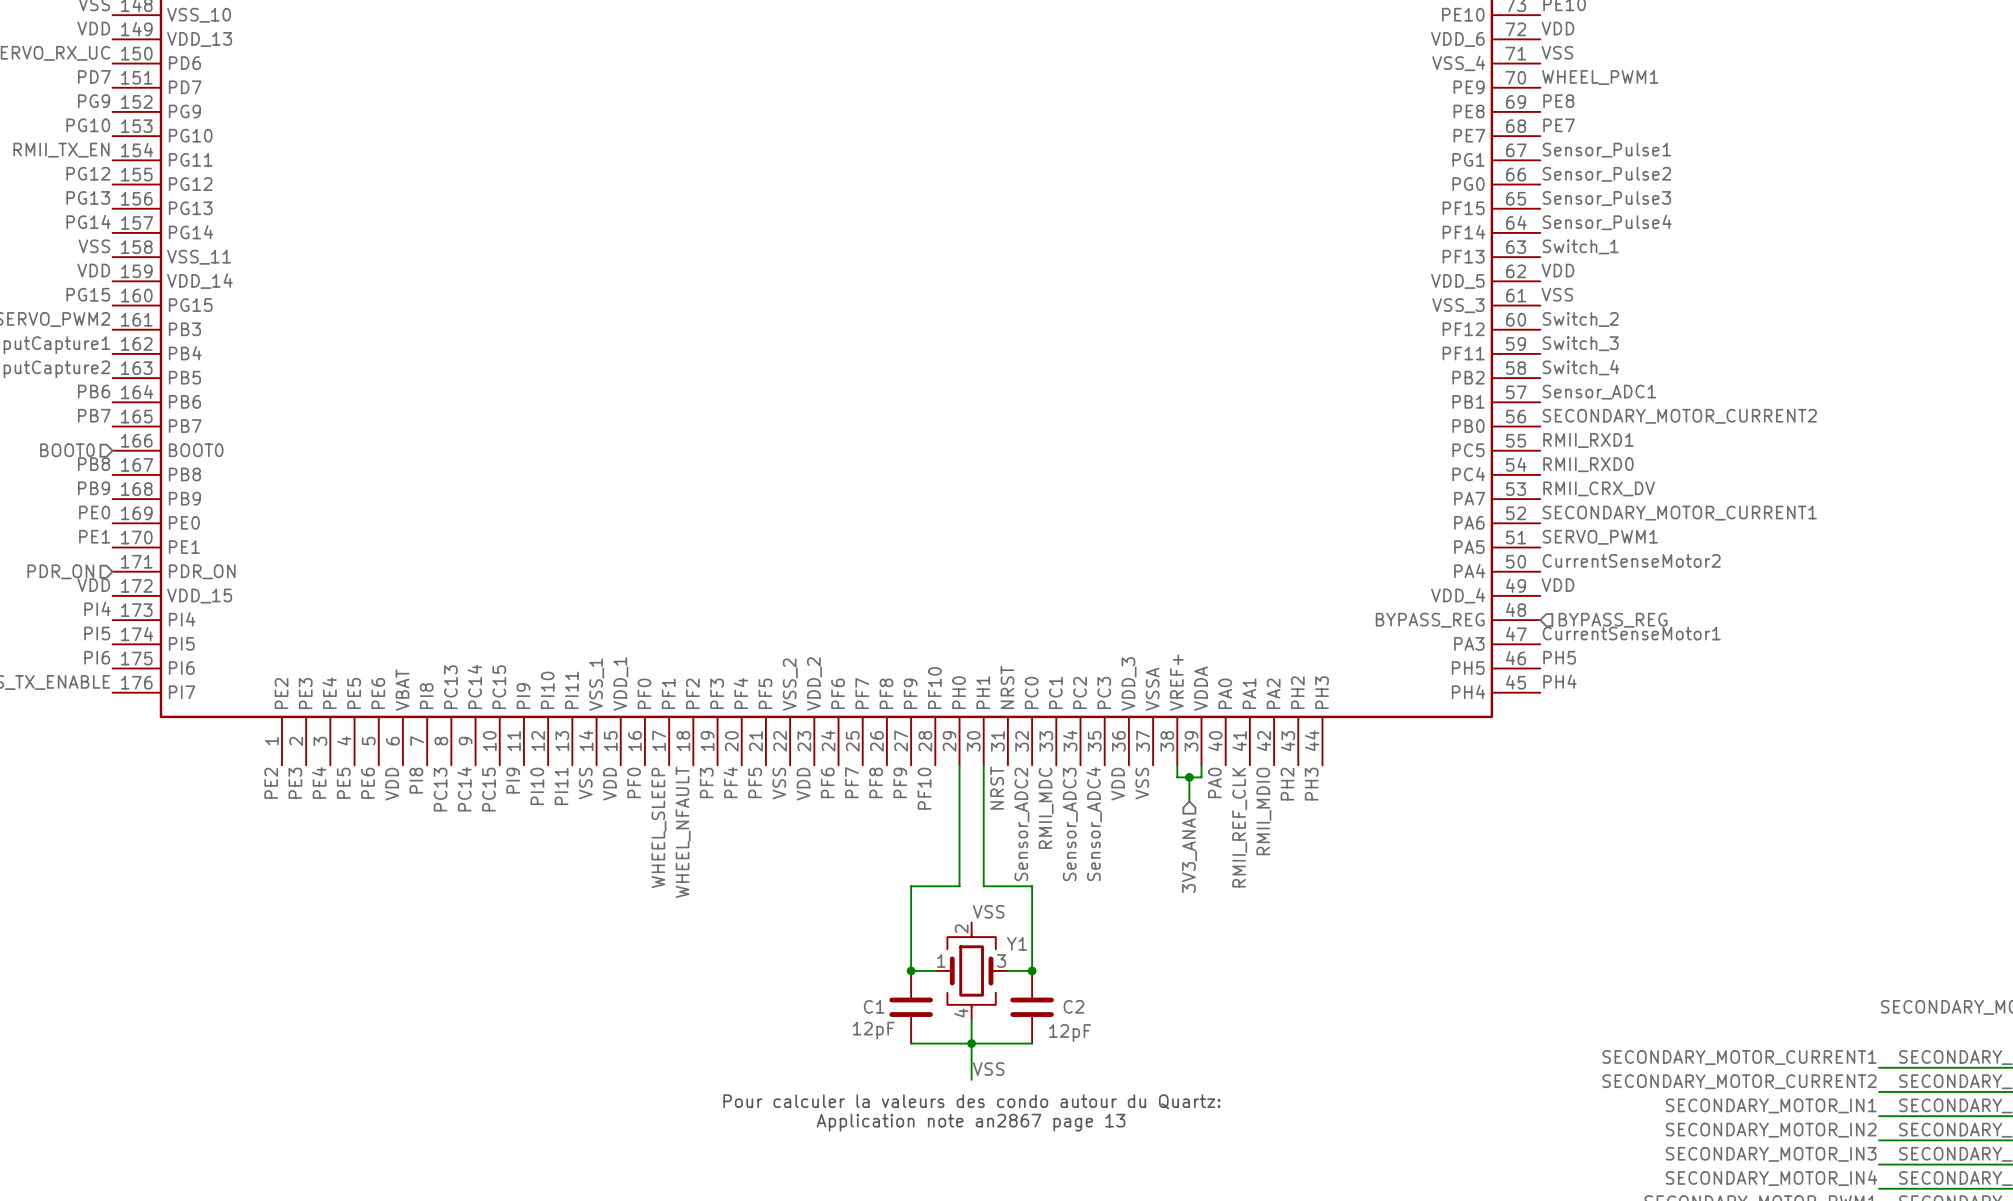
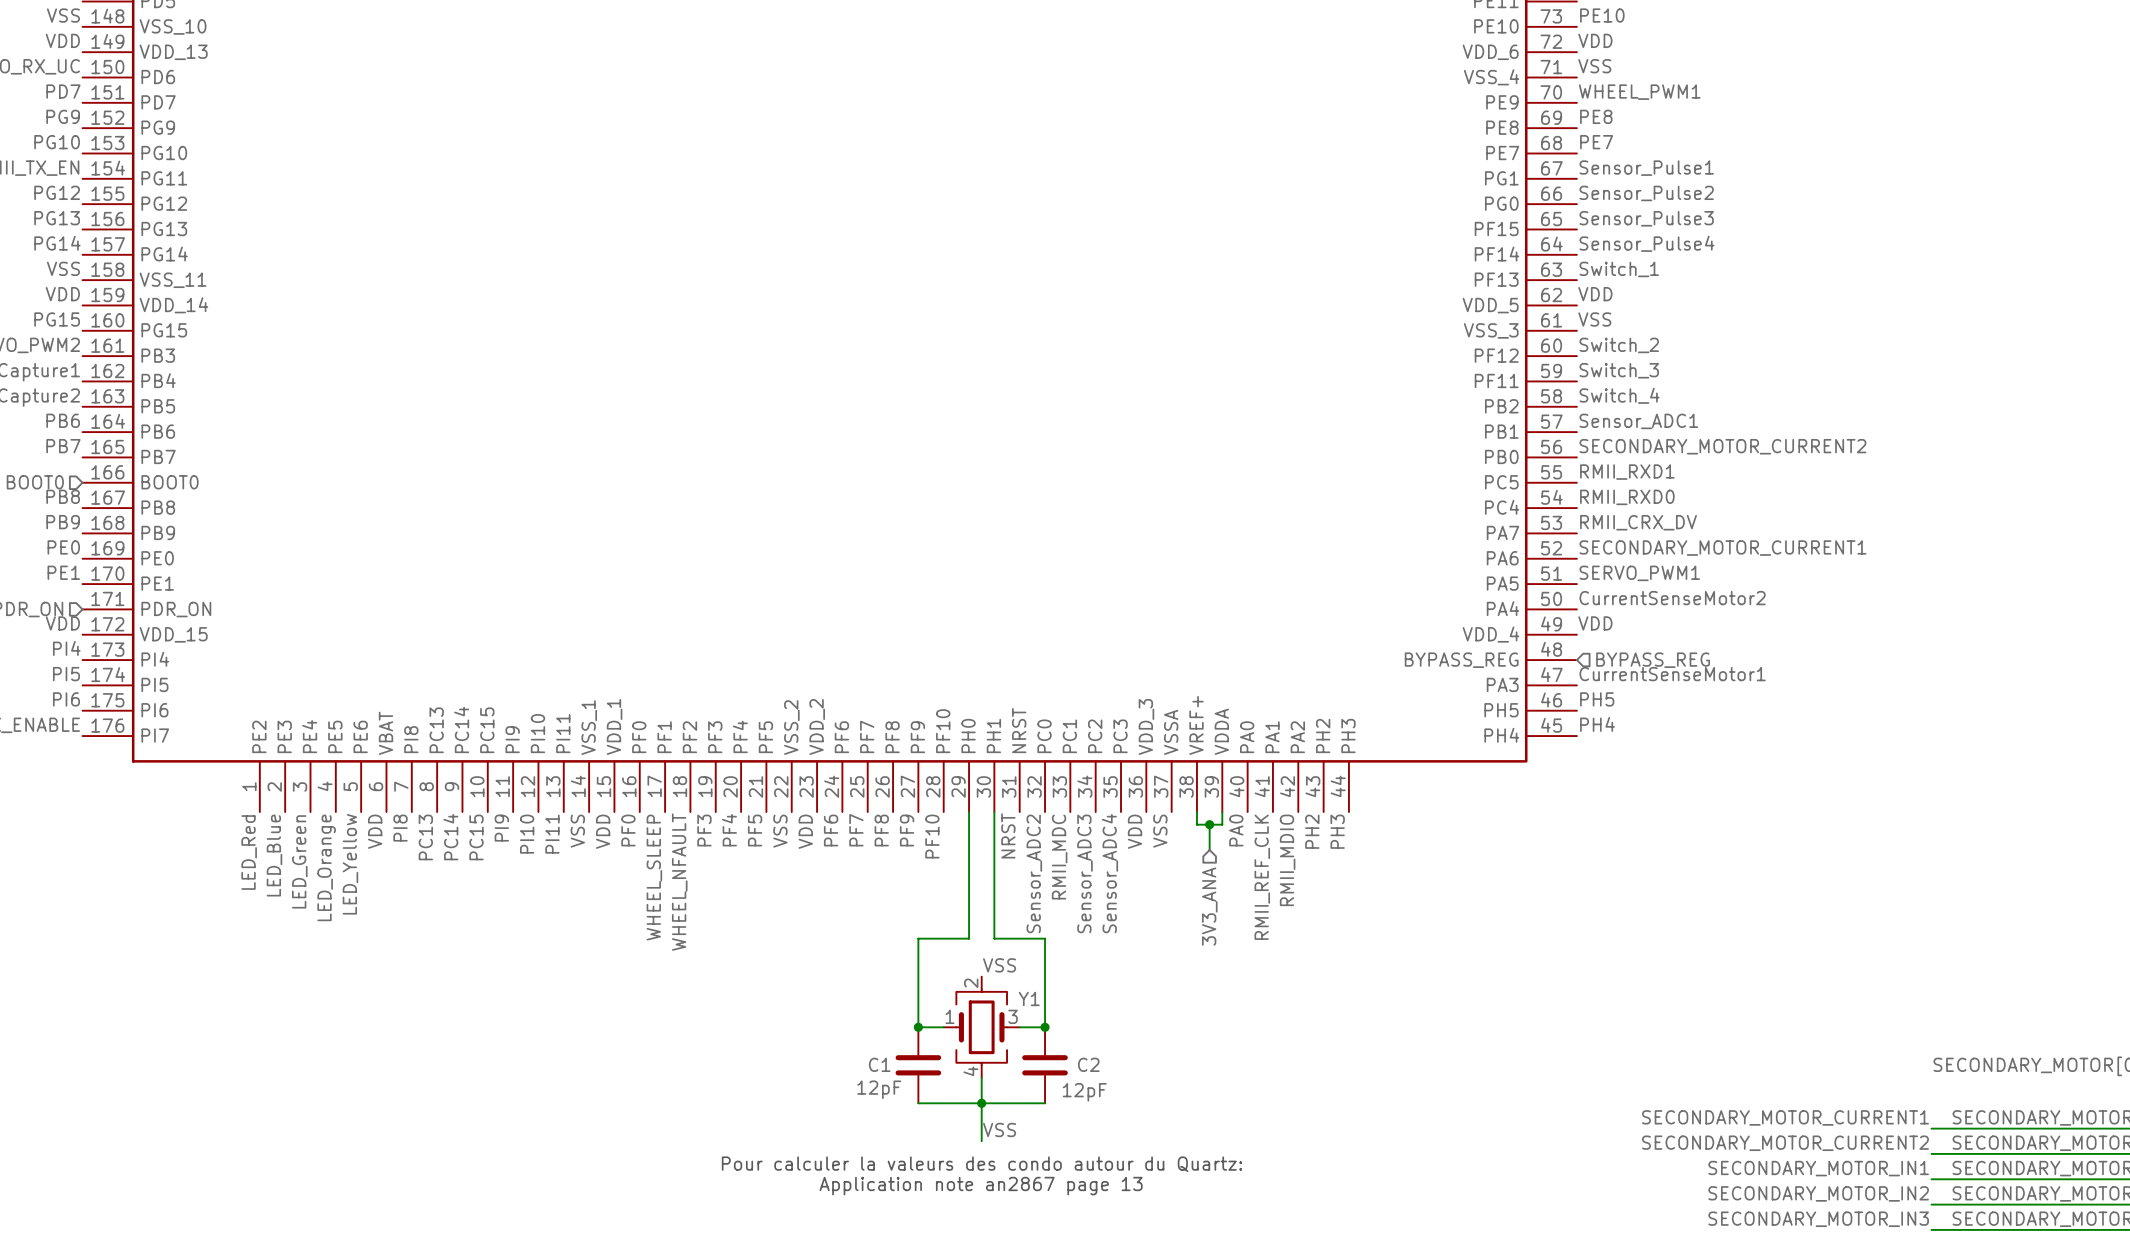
label: PE4 (319, 782) -> LED_Green (299, 861)
label: PE2 (271, 783) -> LED_Red (249, 852)
label: PE3 (295, 783) -> LED_Blue (274, 855)
label: PE5 (343, 783) -> LED_Orange (326, 867)
label: PE6 (367, 783) -> LED_Yellow (350, 864)

